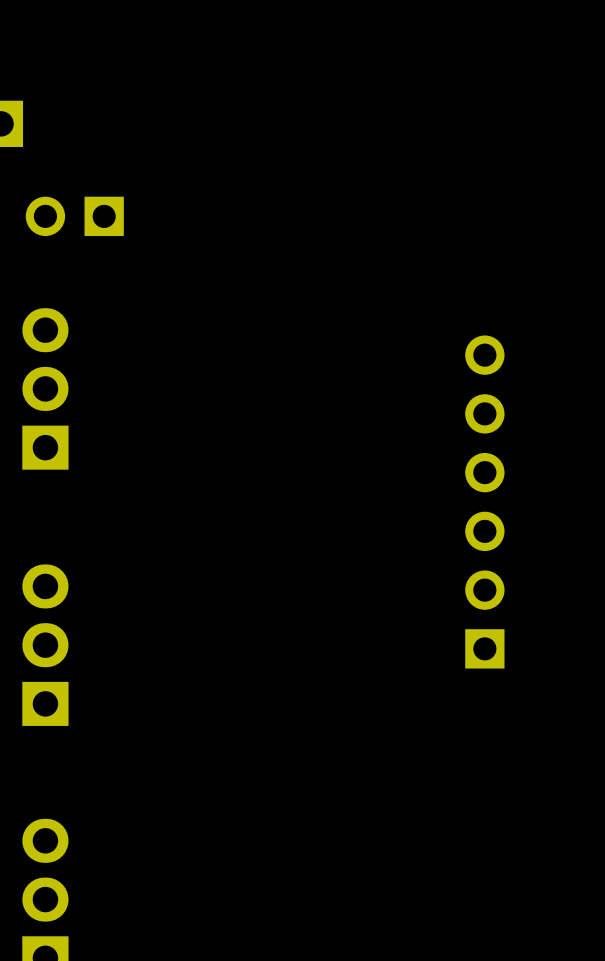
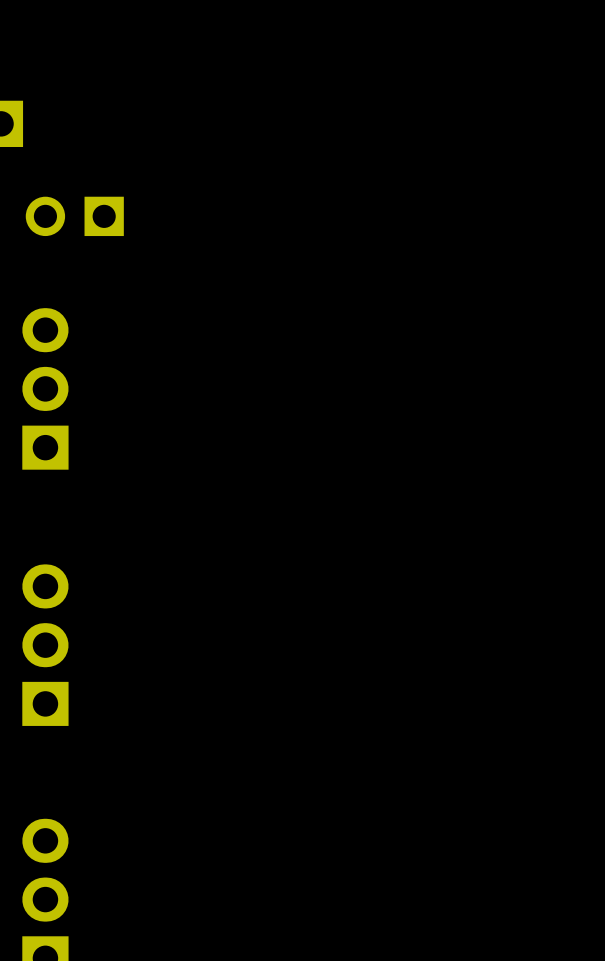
part: (484, 502) -> none

